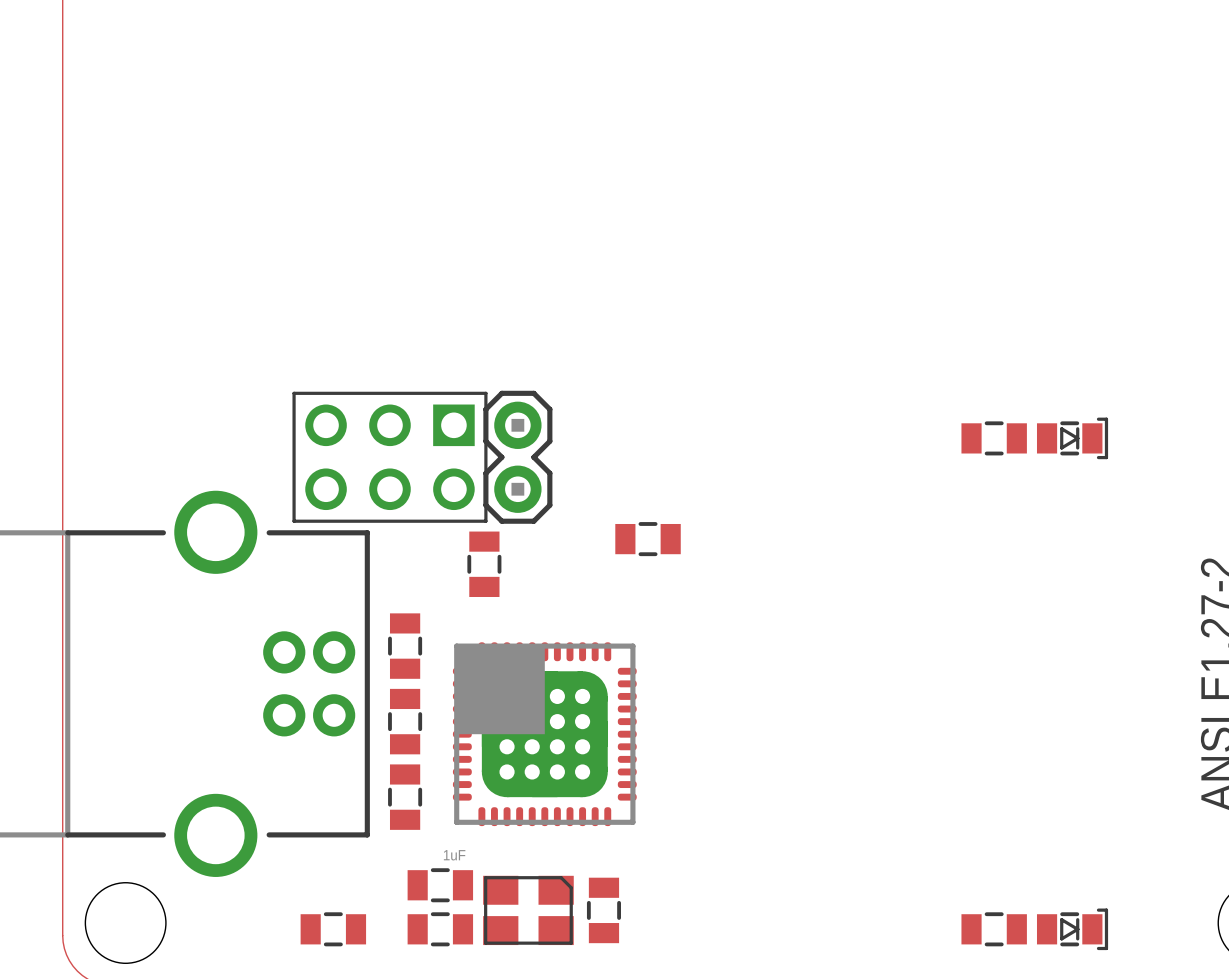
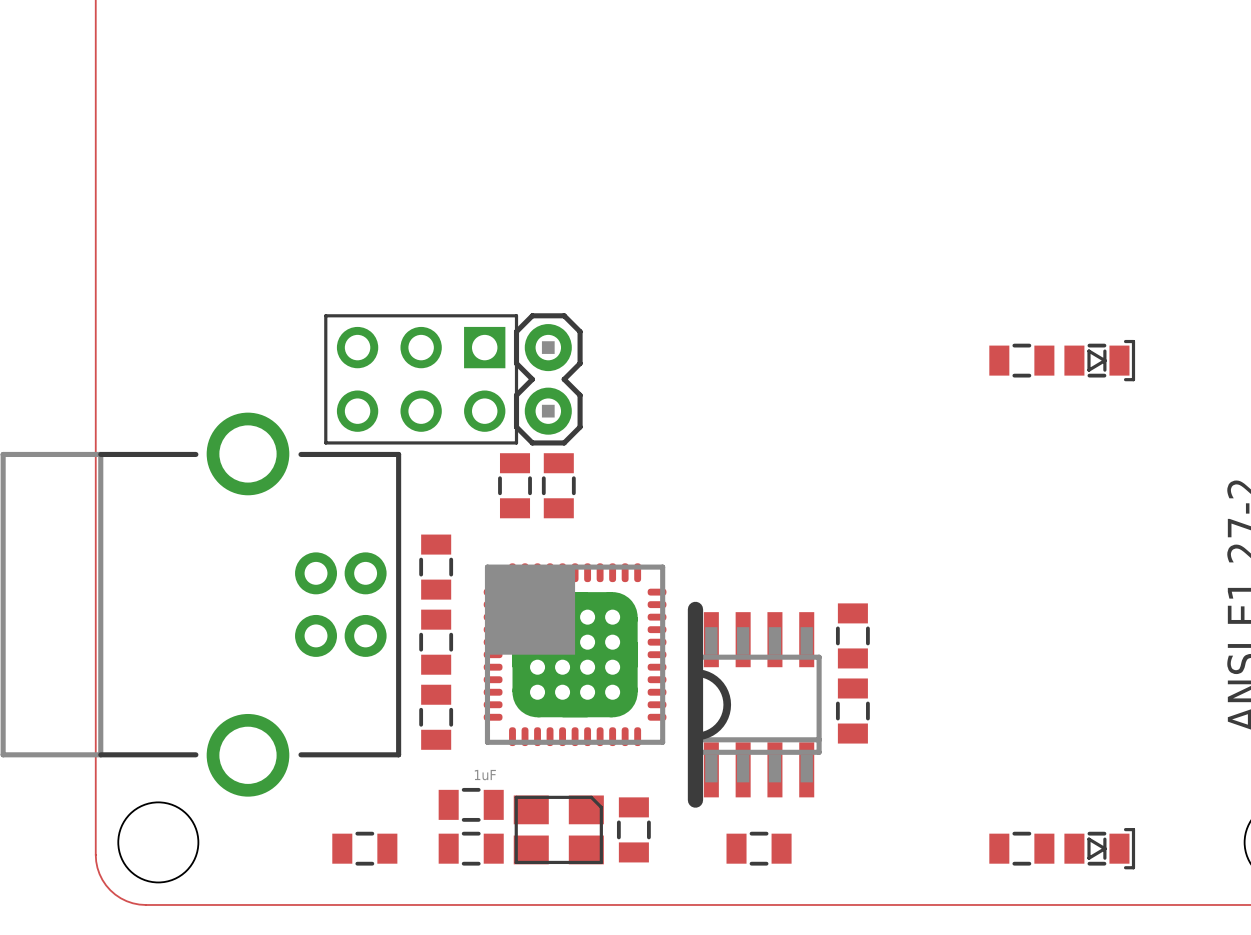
part rotation: 0° (648, 539) -> 90° clockwise (558, 485)
part position: (648, 539) -> (558, 485)
part: none -> (852, 635)
part: none -> (754, 704)
part: none -> (852, 711)
part: none -> (759, 848)

